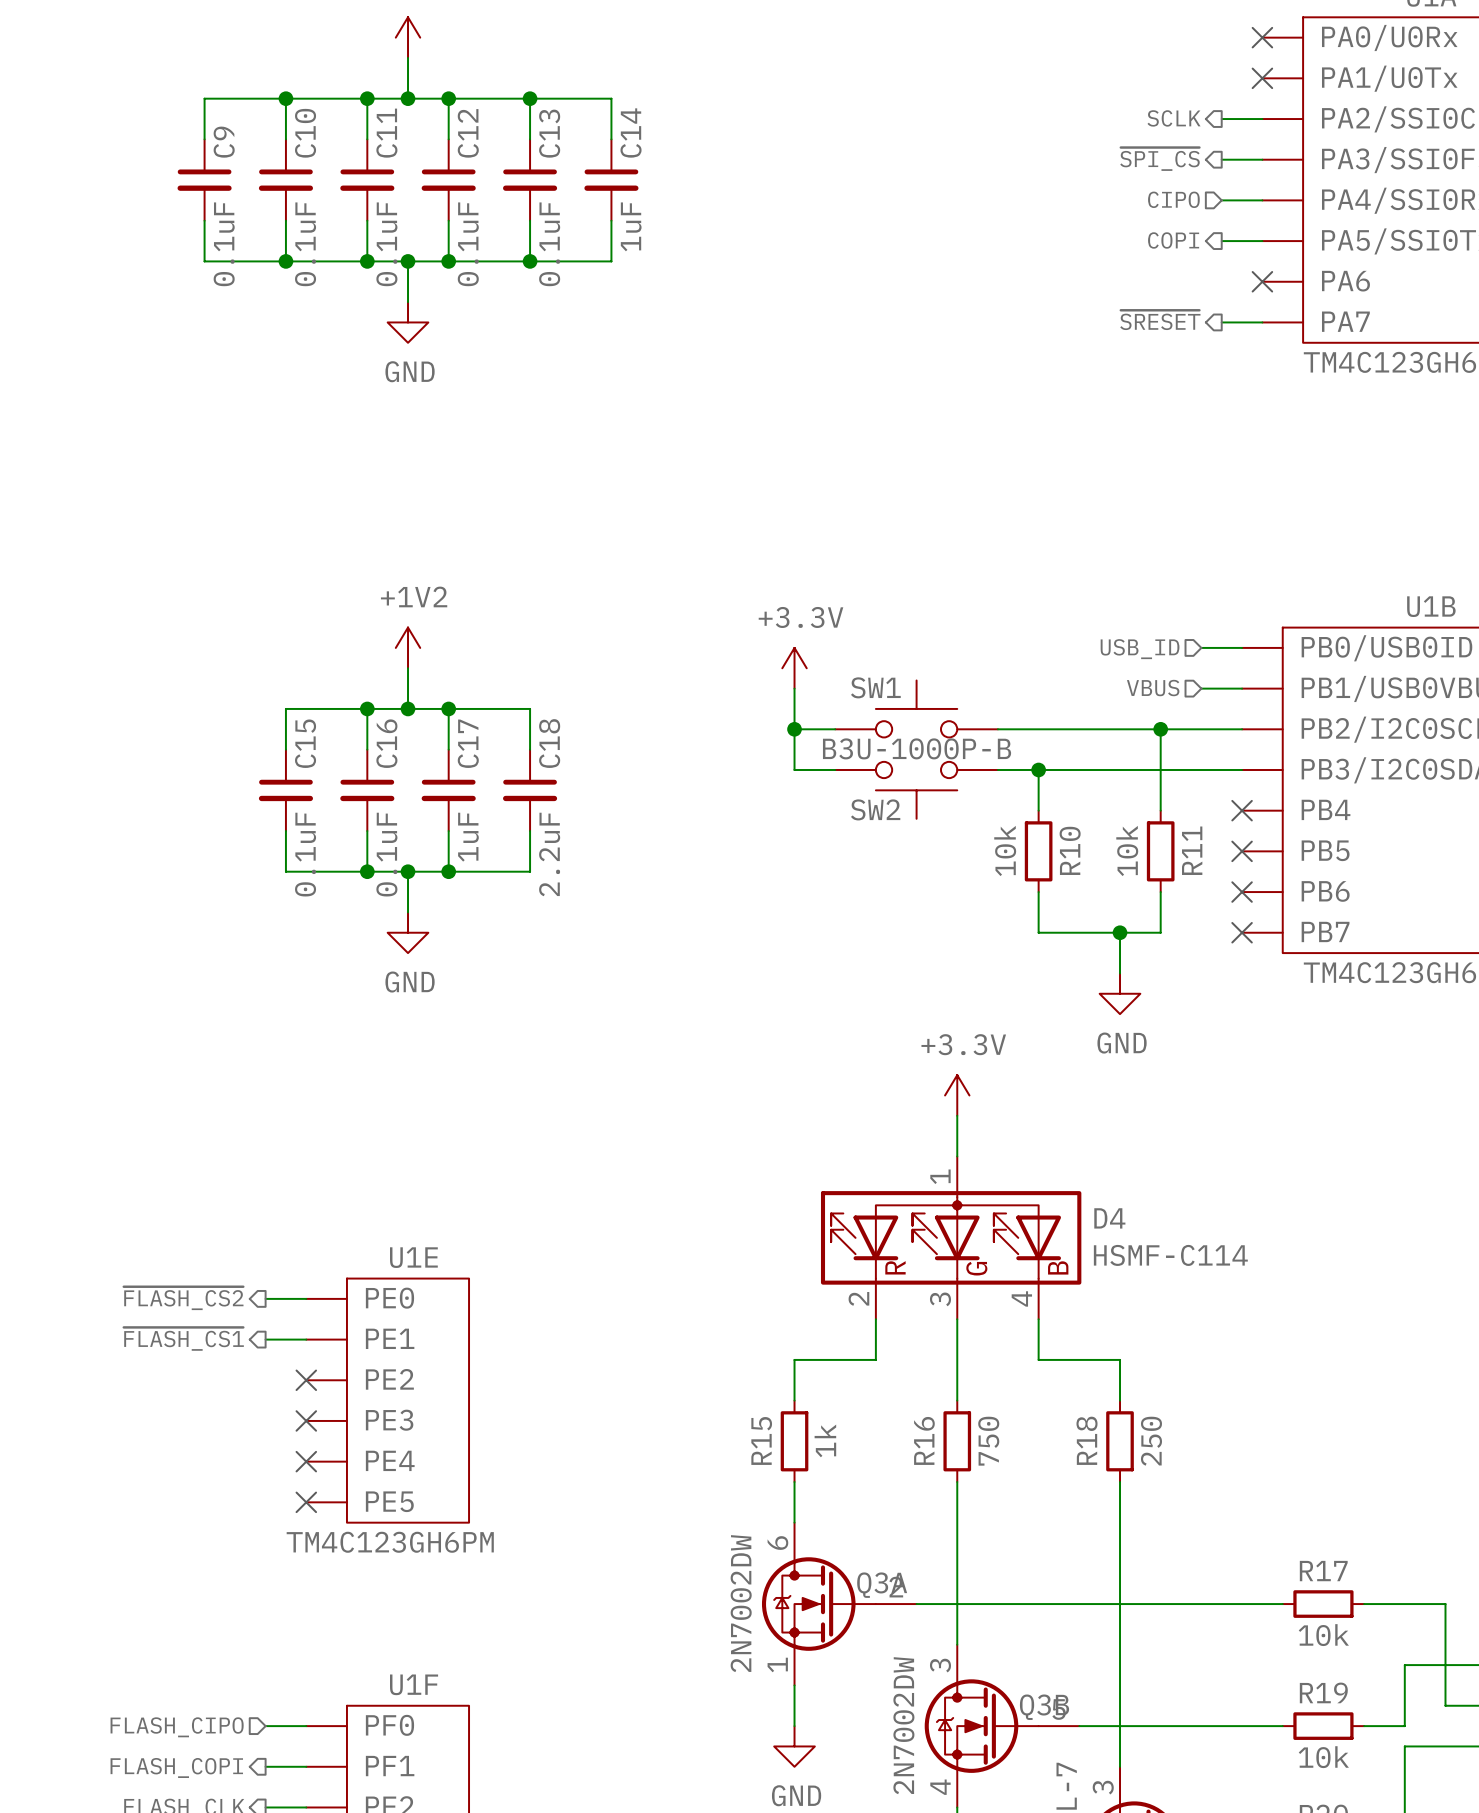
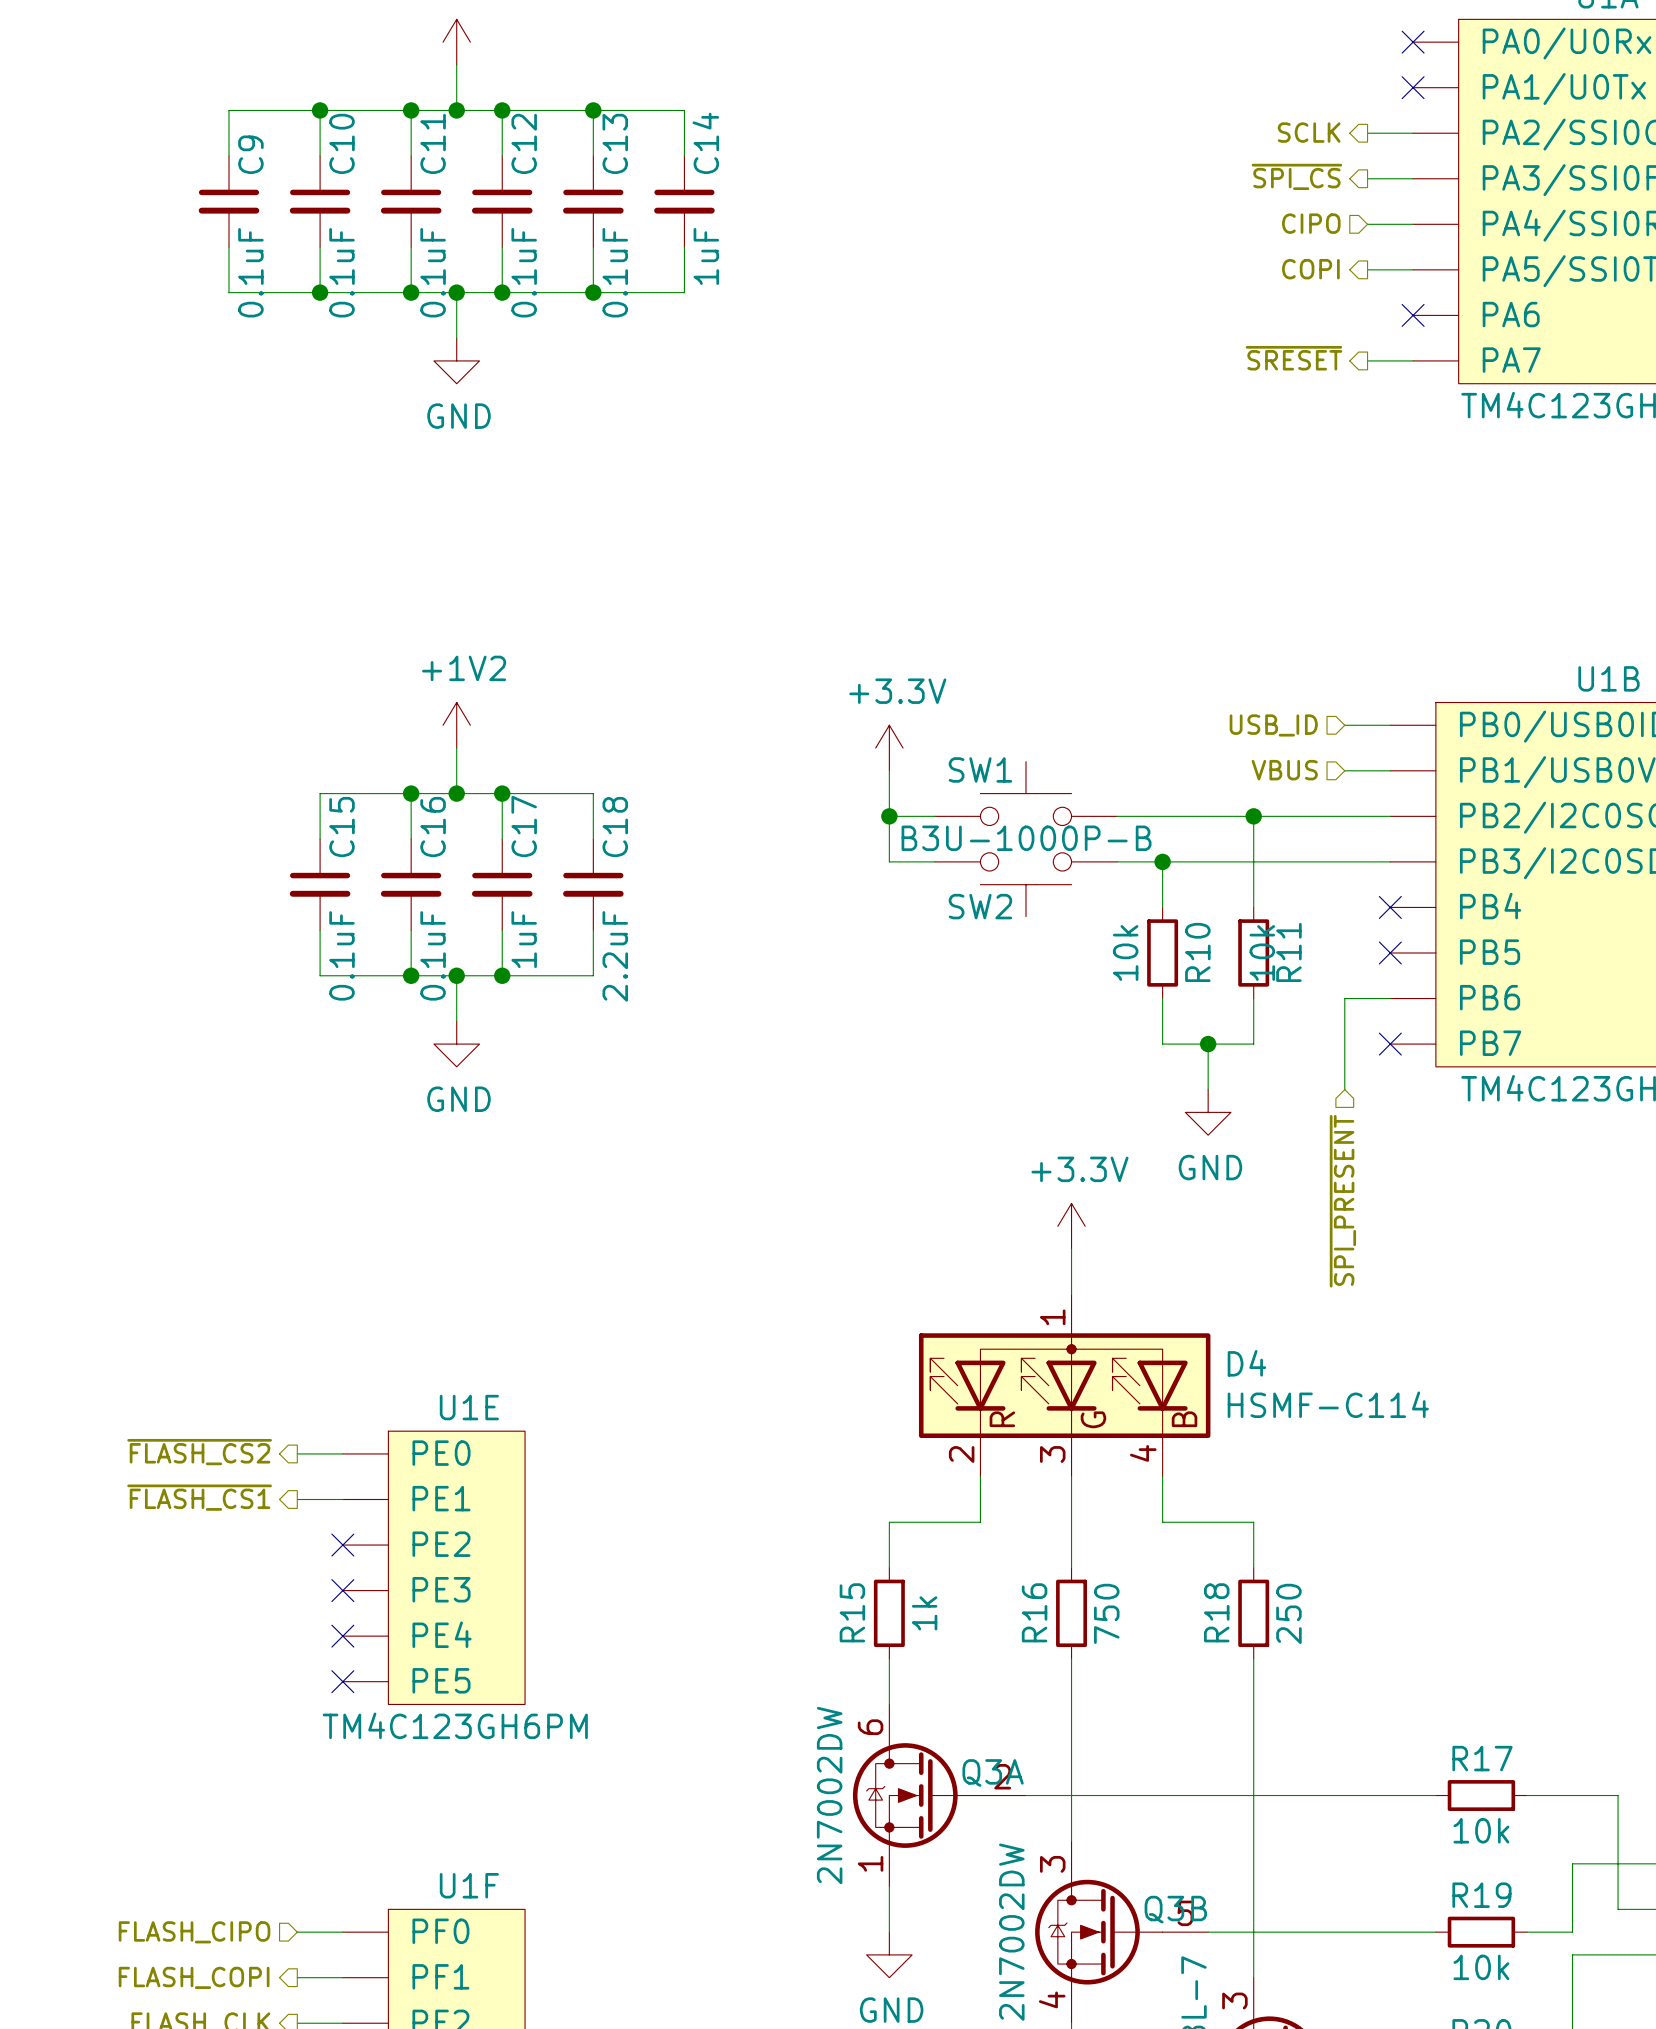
wire: (1160, 729) (1160, 810) -> (1253, 816) (1253, 907)
junction position: (1160, 729) -> (1253, 816)
R11 position: (1160, 851) -> (1253, 952)
wire: none -> (1253, 998) (1253, 1044)
wire: (1160, 892) (1160, 932) (1120, 932) (1120, 973) -> none
wire: none -> (1390, 998) (1344, 998) (1344, 1089)
no-connect mark: (1242, 892) -> none
wire: none -> (1208, 1044) (1208, 1089)
junction position: (1120, 932) -> (1208, 1044)
power symbol position: GND (1120, 993) -> GND (1208, 1112)
hierarchical label: none -> ~{SPI_PRESENT} (1342, 1201)

